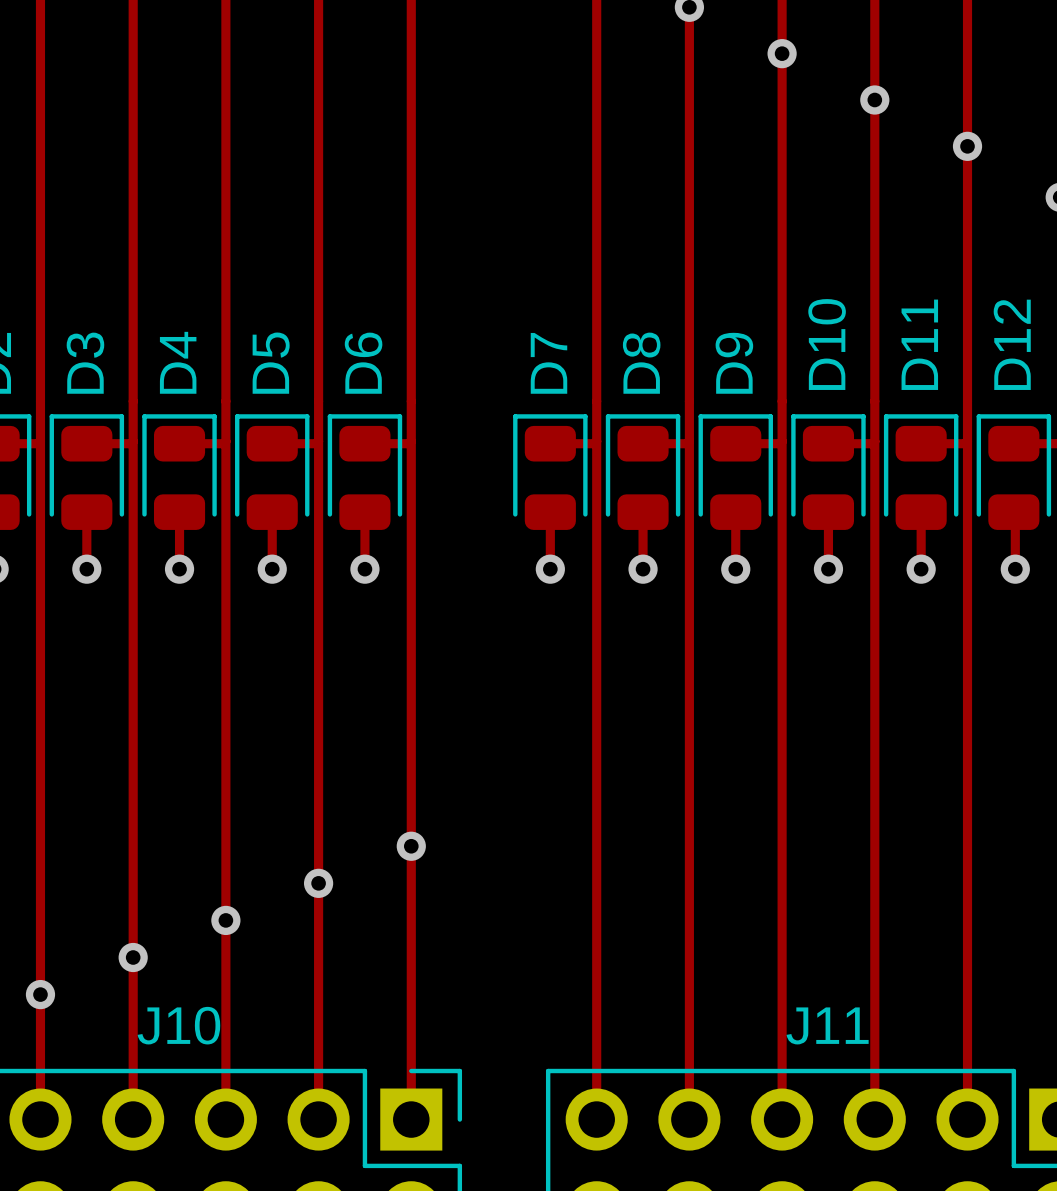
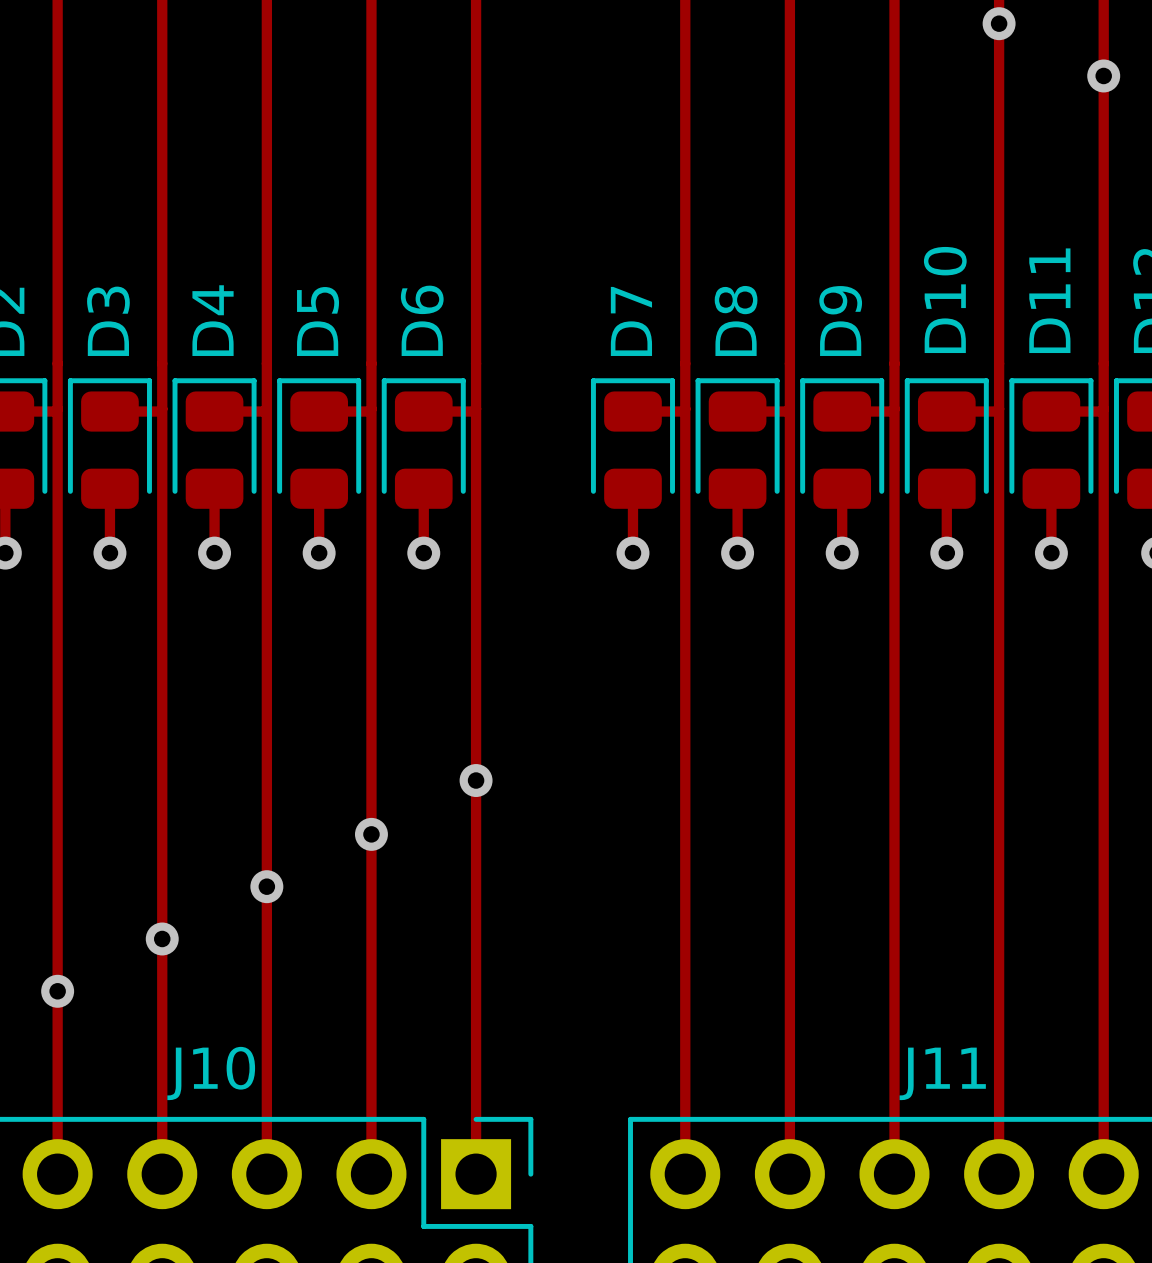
via: none -> (476, 780)
via: none -> (371, 834)
via: (411, 846) -> none
via: none -> (266, 886)
via: (318, 883) -> none
via: none -> (162, 938)
via: (225, 920) -> none
via: (133, 957) -> none
via position: (40, 994) -> (57, 991)

